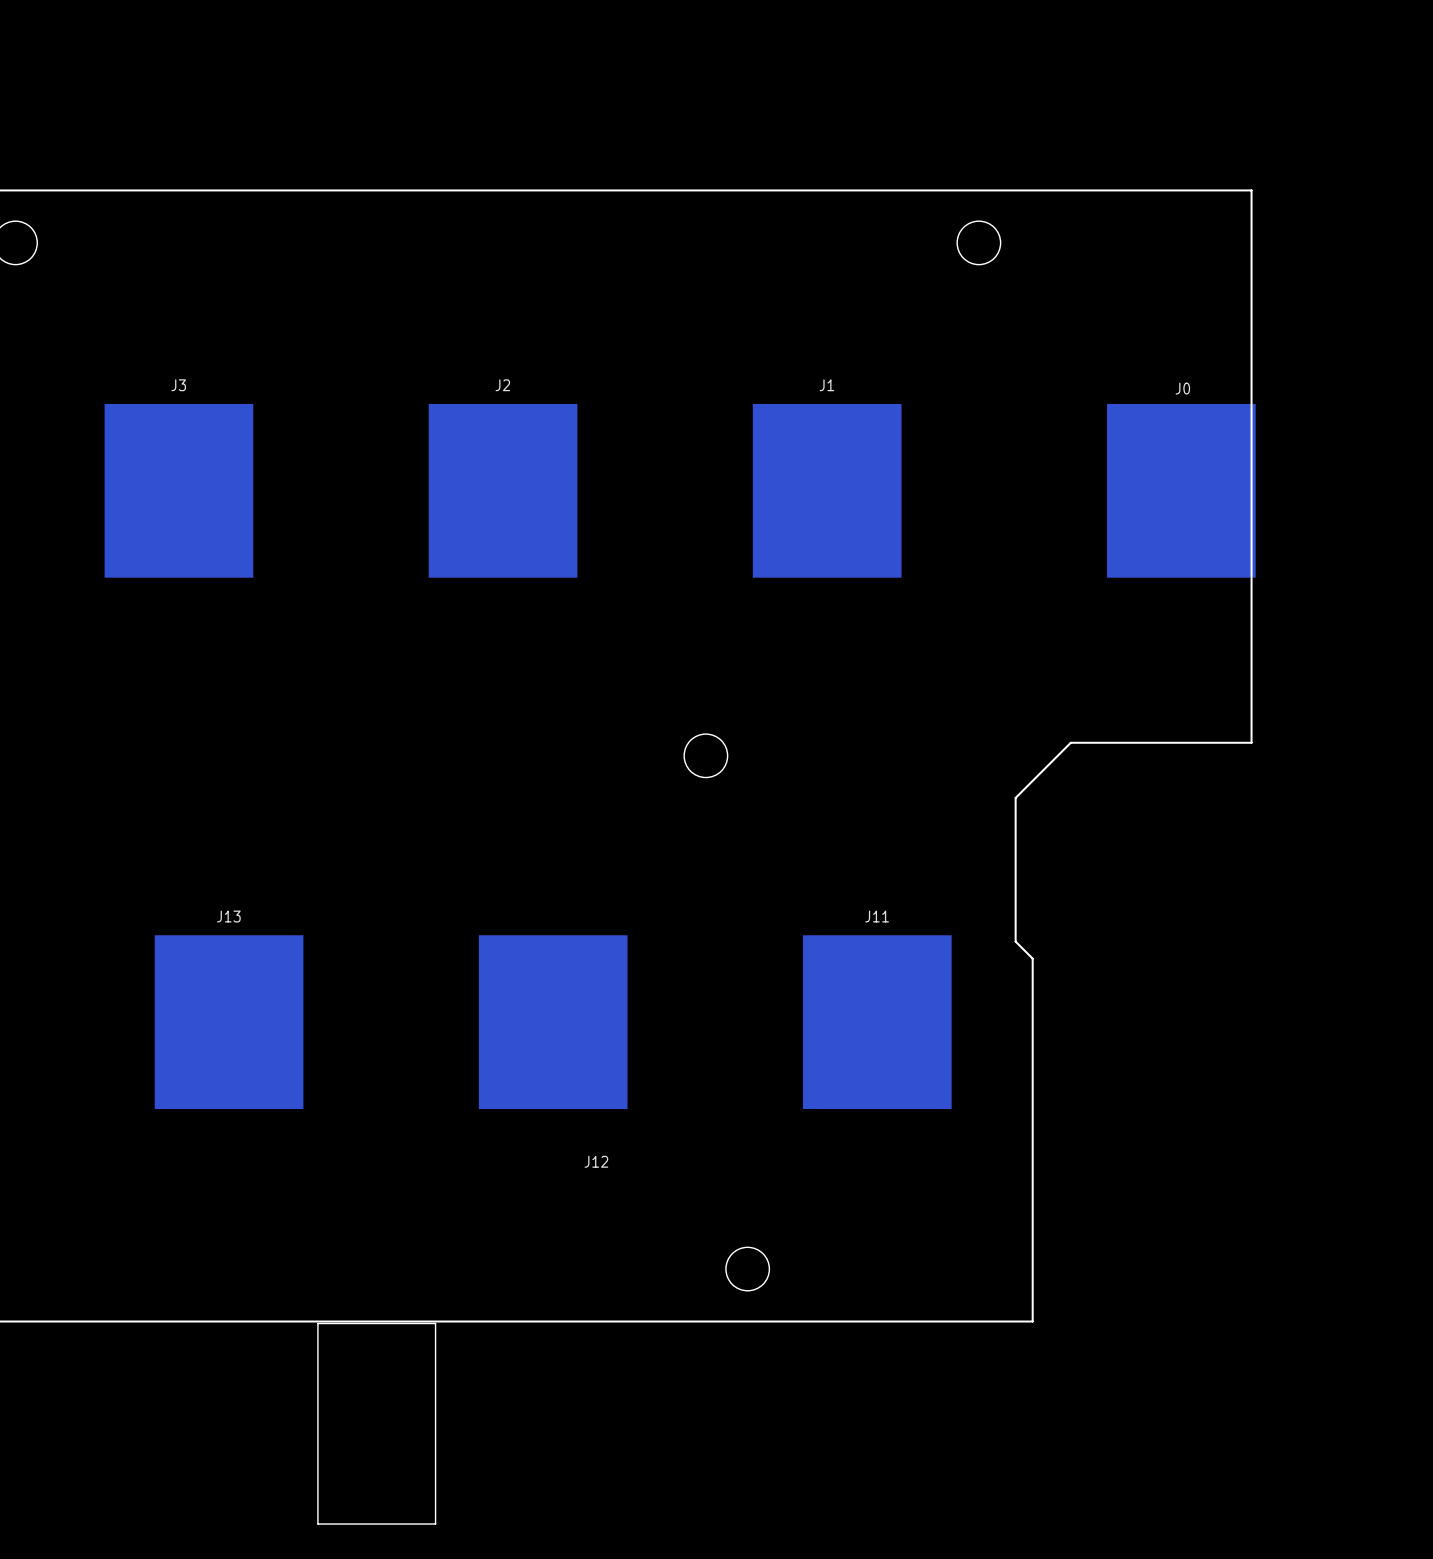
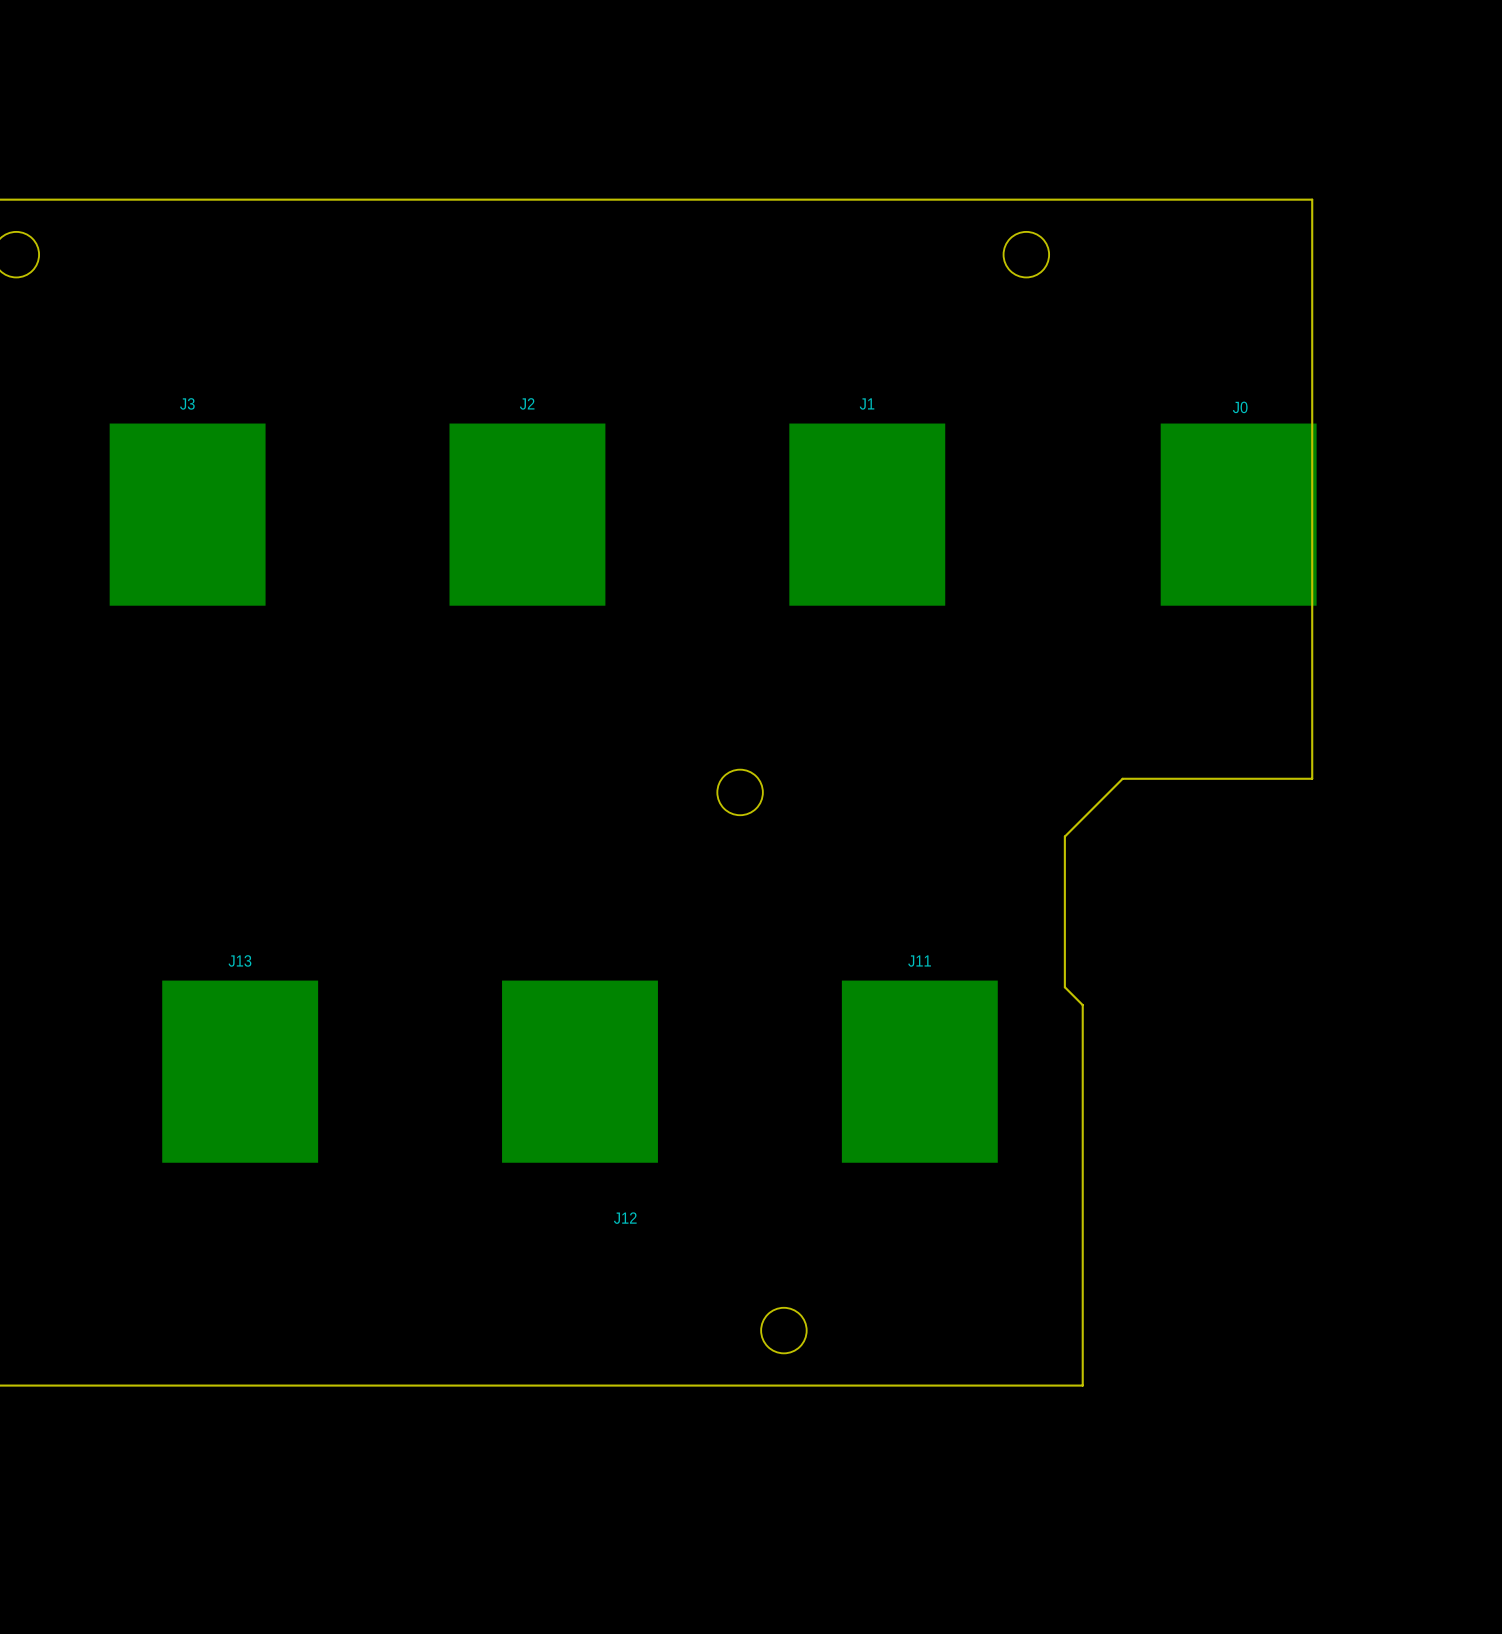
part: (376, 1423) -> none

